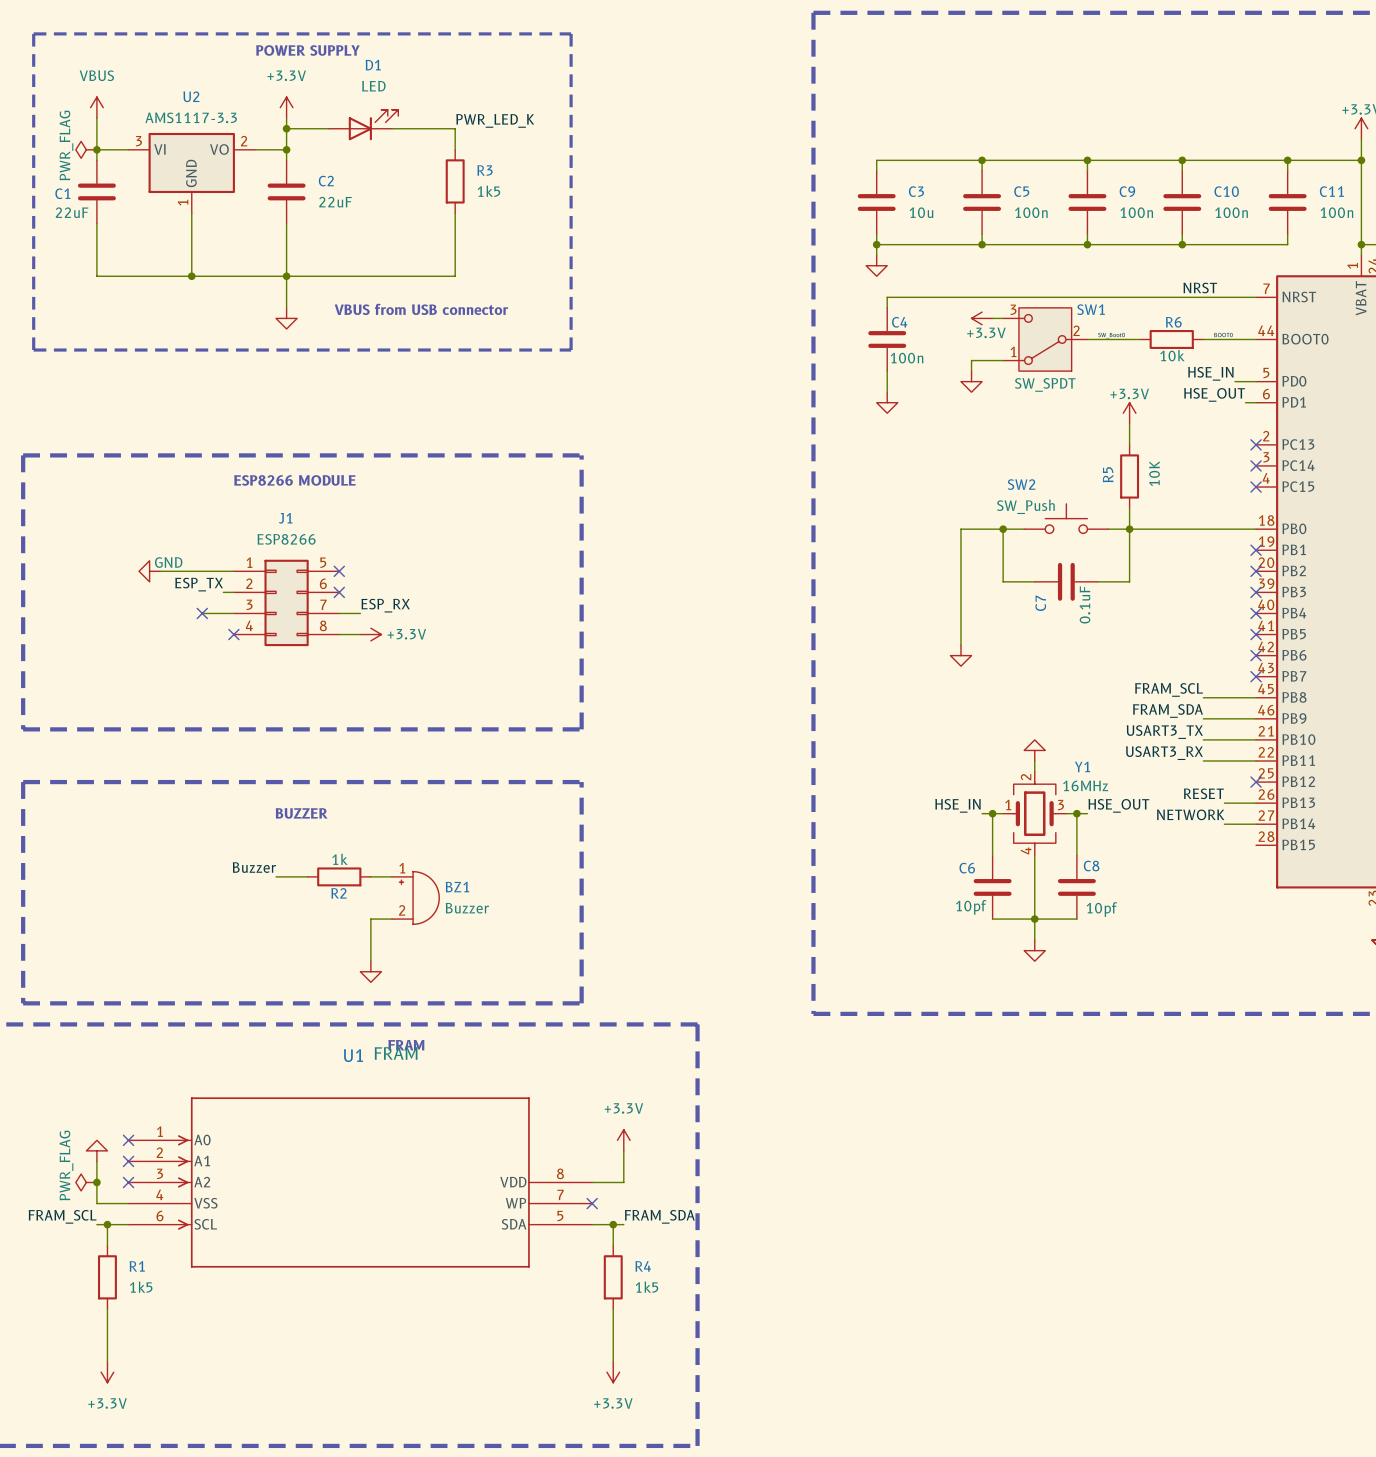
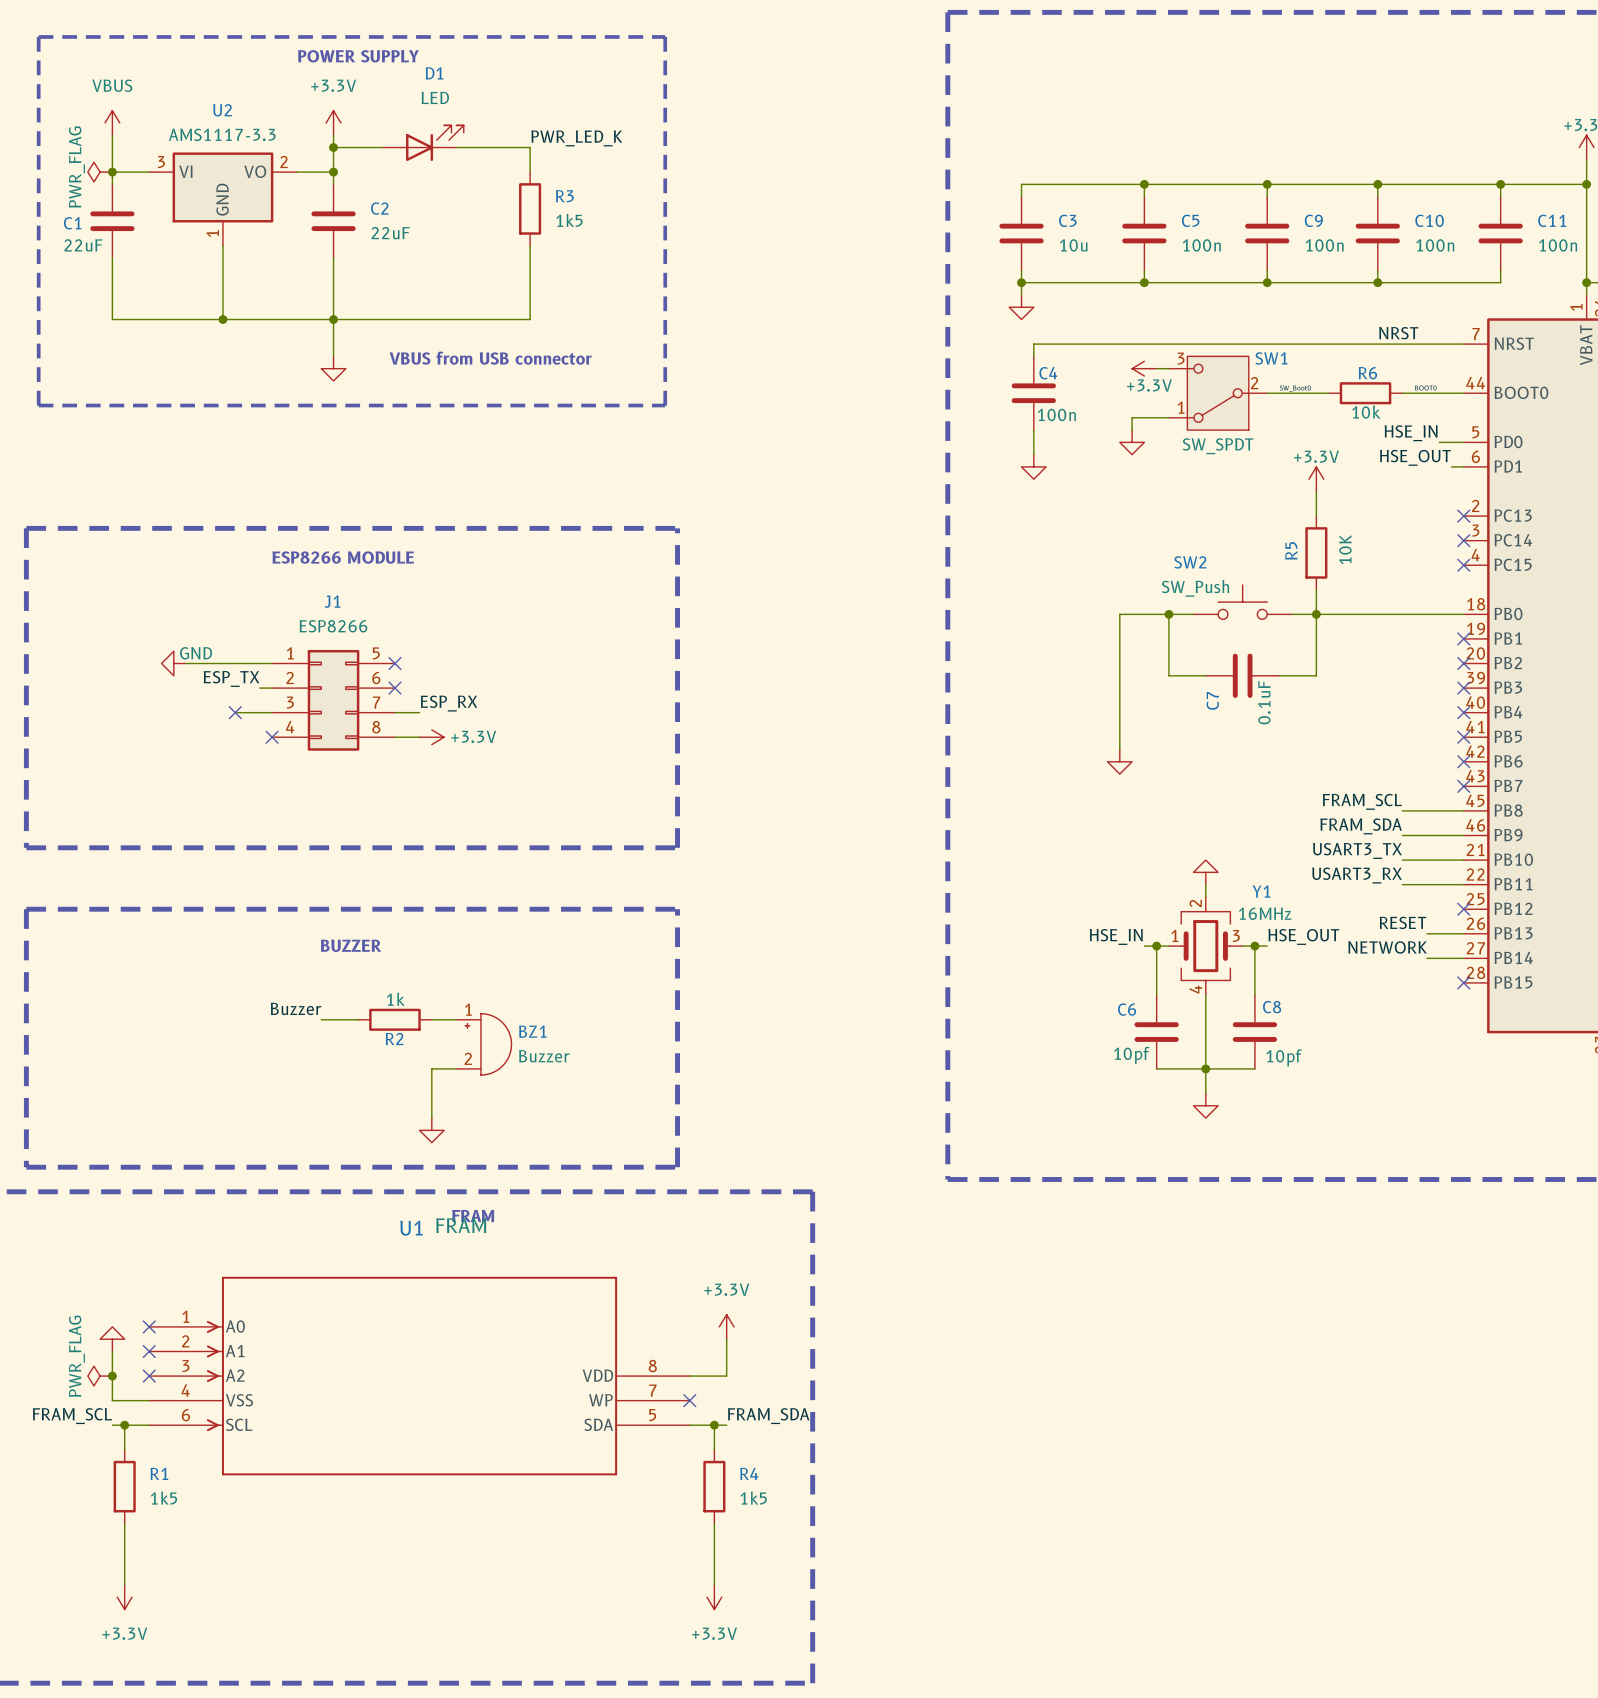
no-connect mark: none -> (1463, 982)

